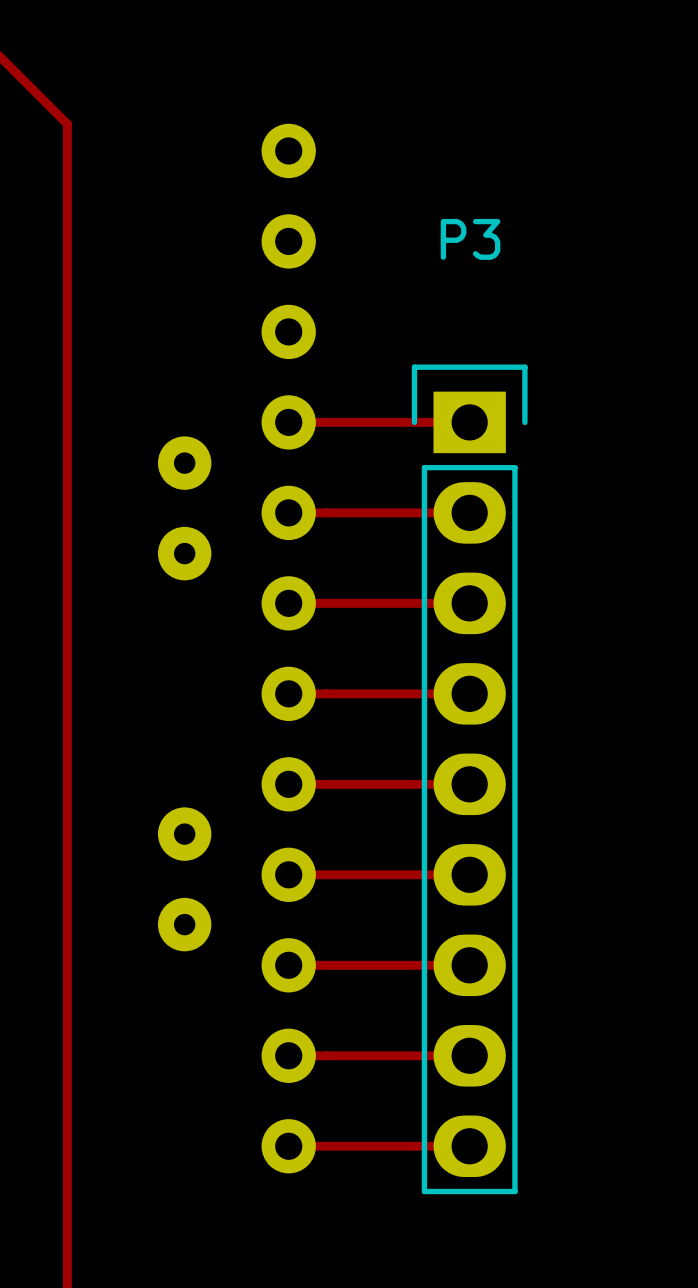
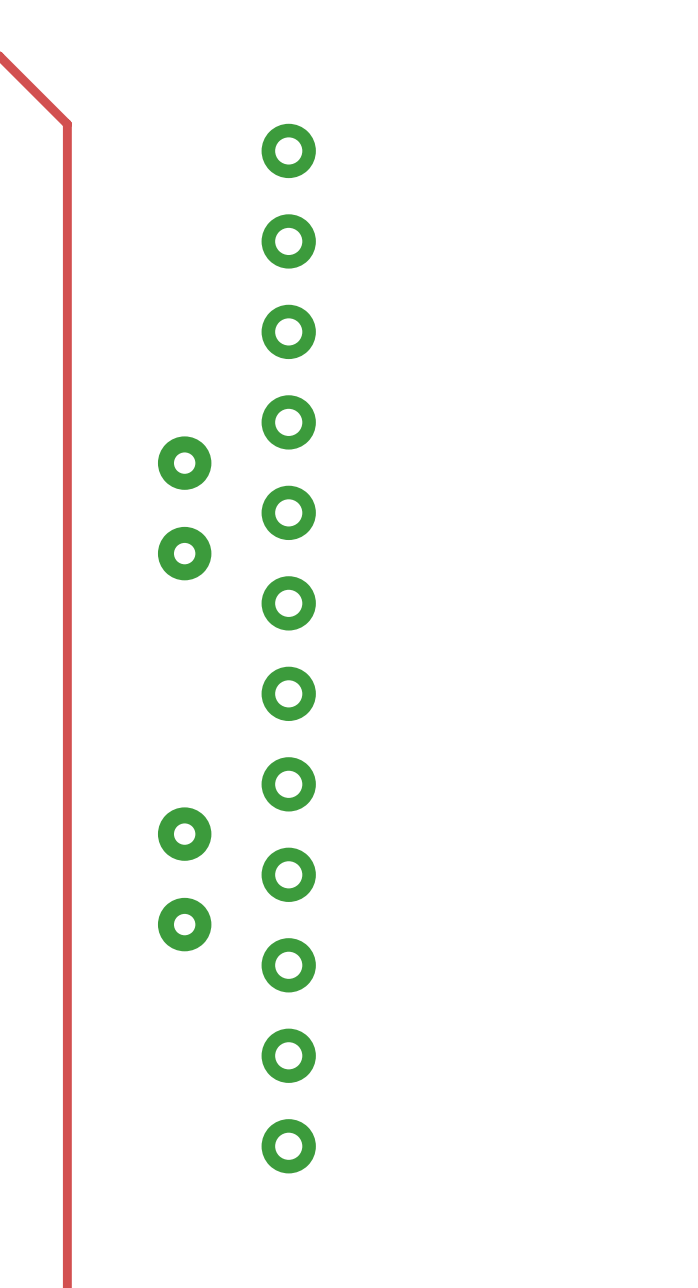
track: (288, 422) (469, 422) -> none
track: (288, 512) (469, 512) -> none
track: (288, 603) (469, 603) -> none
track: (288, 693) (469, 693) -> none
P3: (469, 779) -> none
track: (288, 784) (469, 784) -> none
track: (288, 874) (469, 874) -> none
track: (288, 965) (469, 965) -> none
track: (288, 1055) (469, 1055) -> none
track: (288, 1146) (469, 1146) -> none

